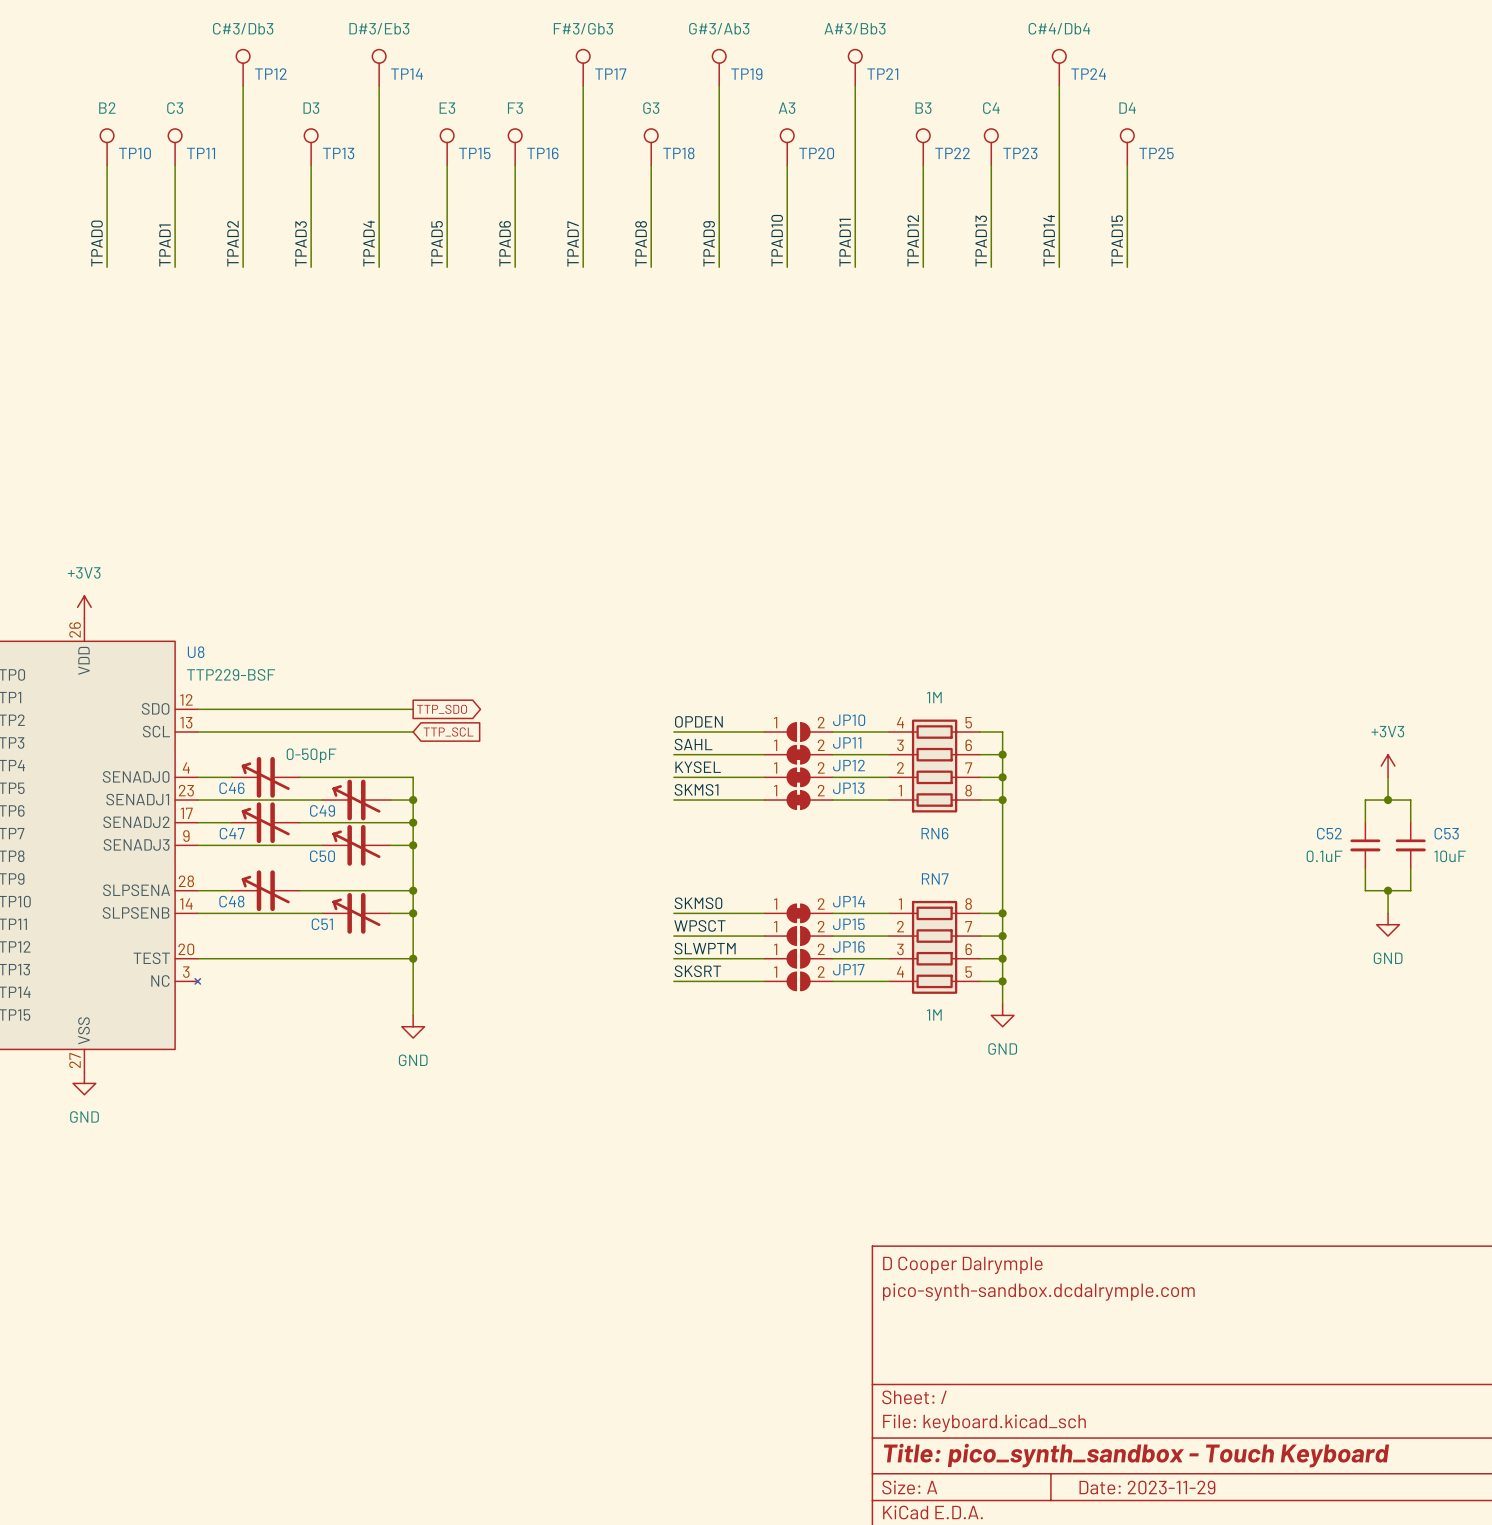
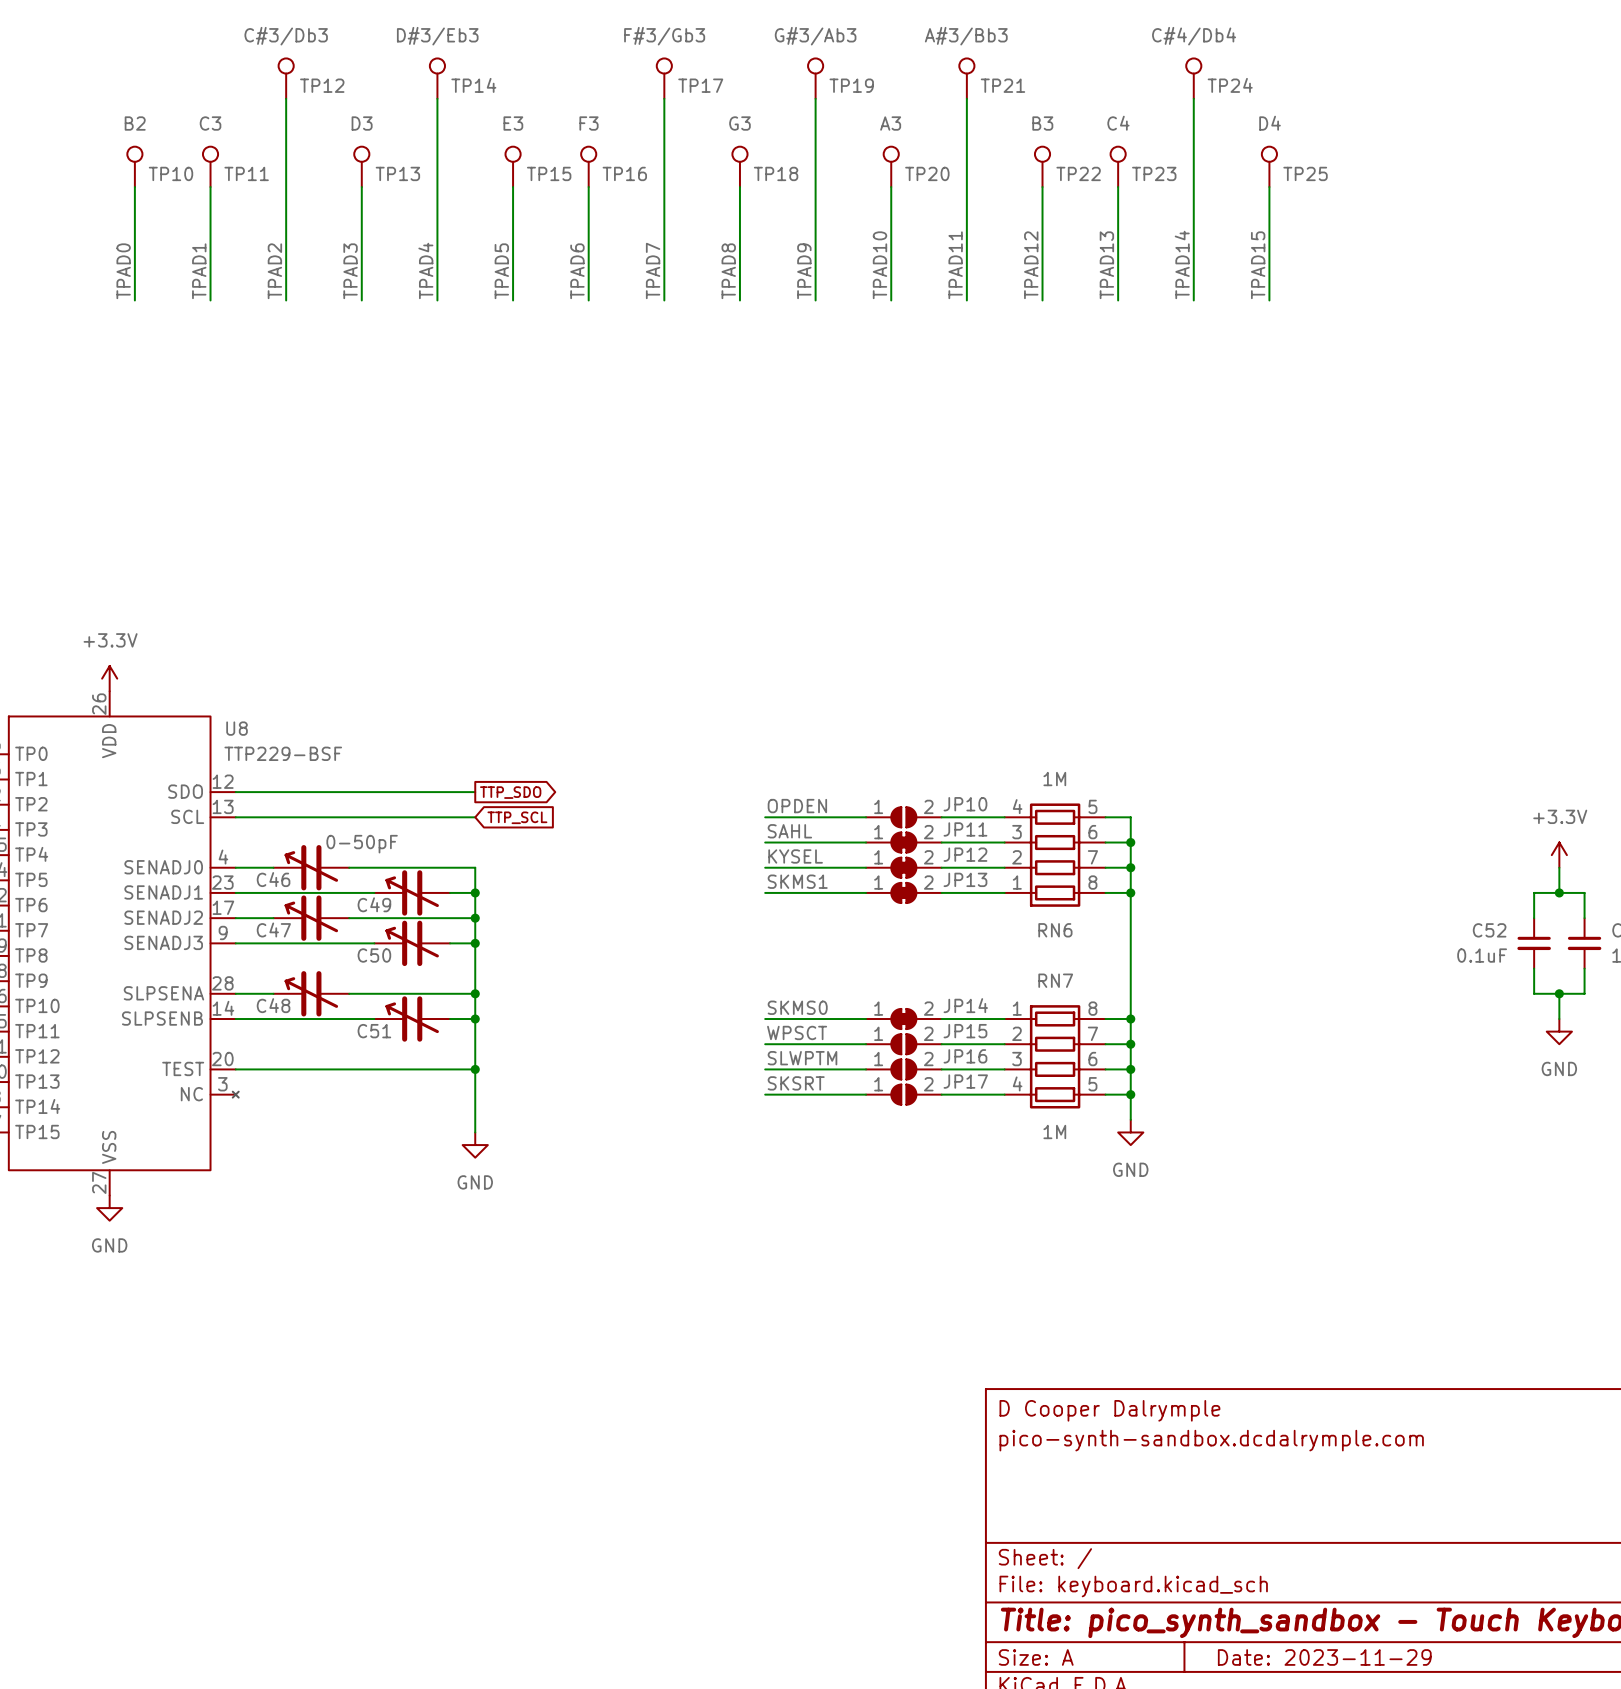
power symbol: +3V3 (84, 607) -> +3.3V (109, 678)
power symbol: +3V3 (1388, 766) -> +3.3V (1559, 855)

